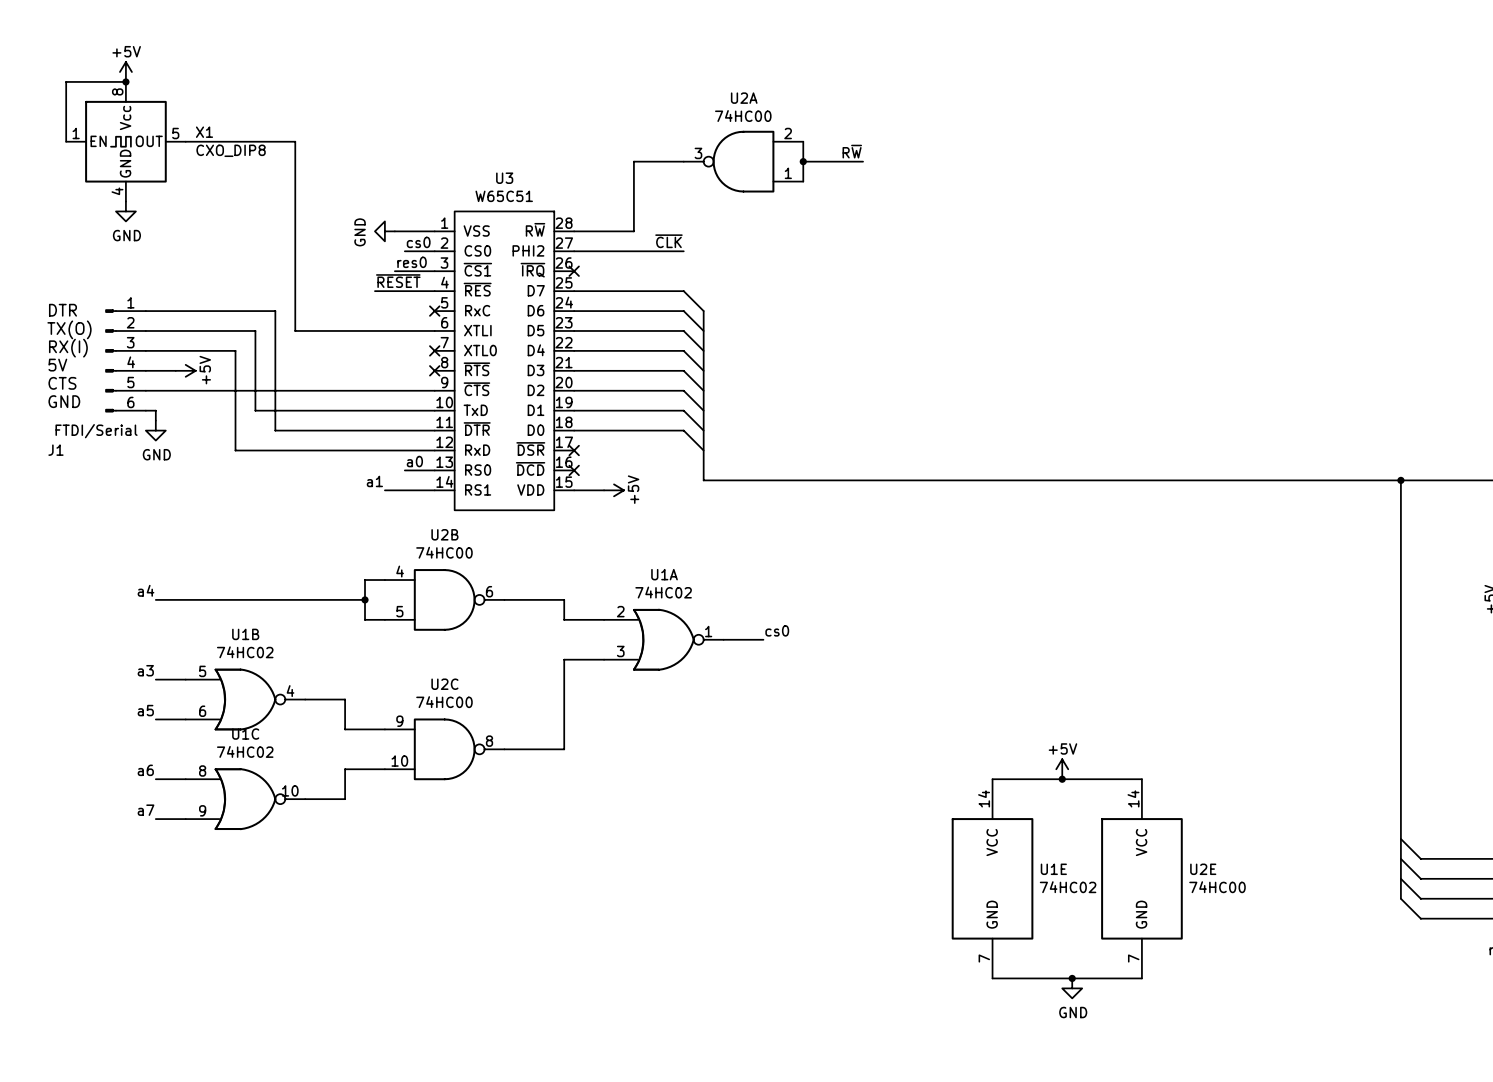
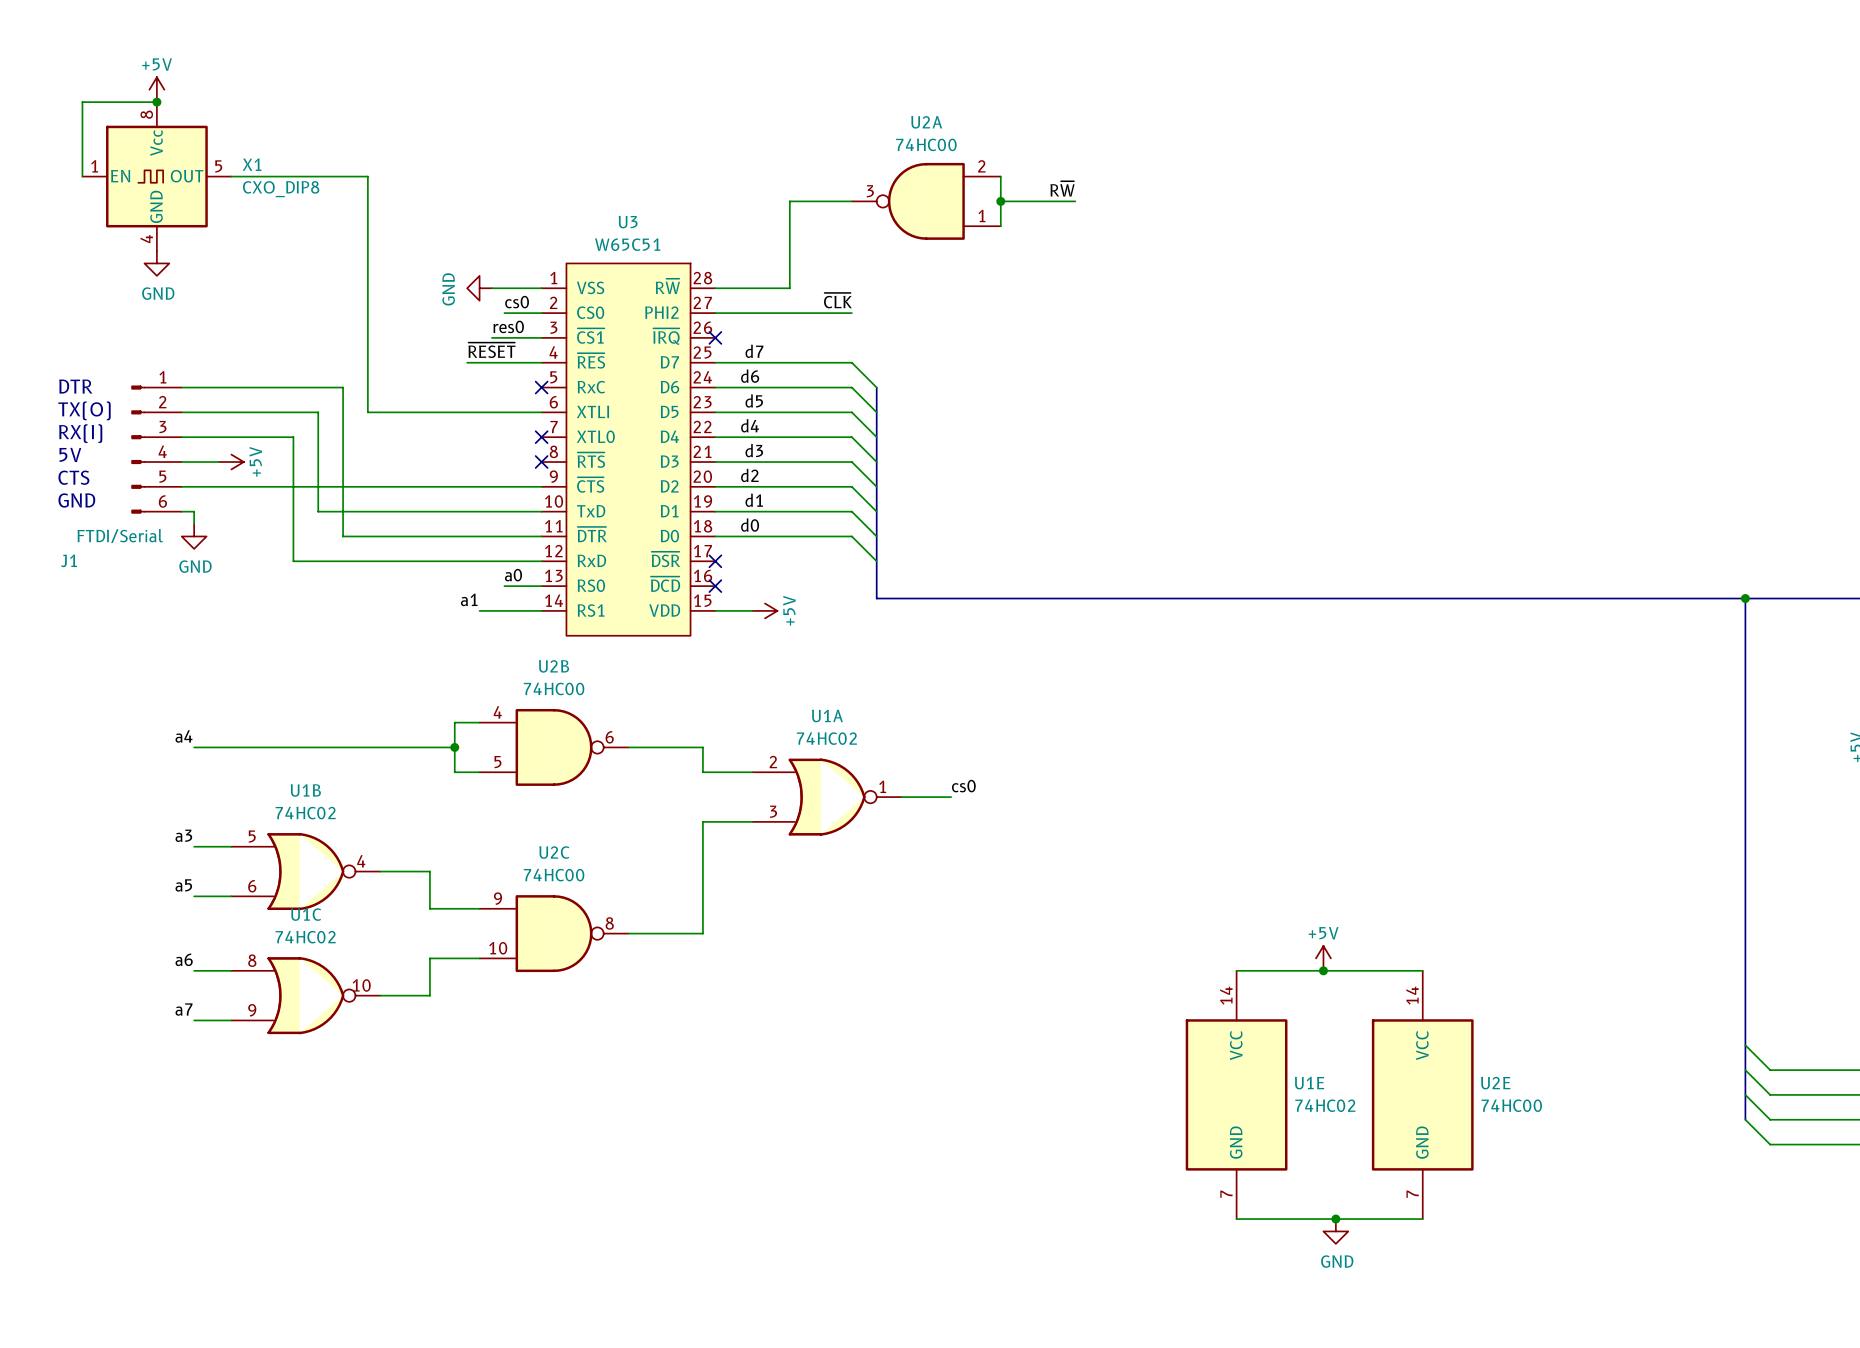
label: none -> d7 (754, 351)
label: none -> d6 (750, 376)
label: none -> d5 (754, 400)
label: none -> d4 (750, 425)
label: none -> d3 (754, 450)
label: none -> d2 (749, 475)
label: none -> d1 (754, 500)
label: none -> d0 (750, 525)

